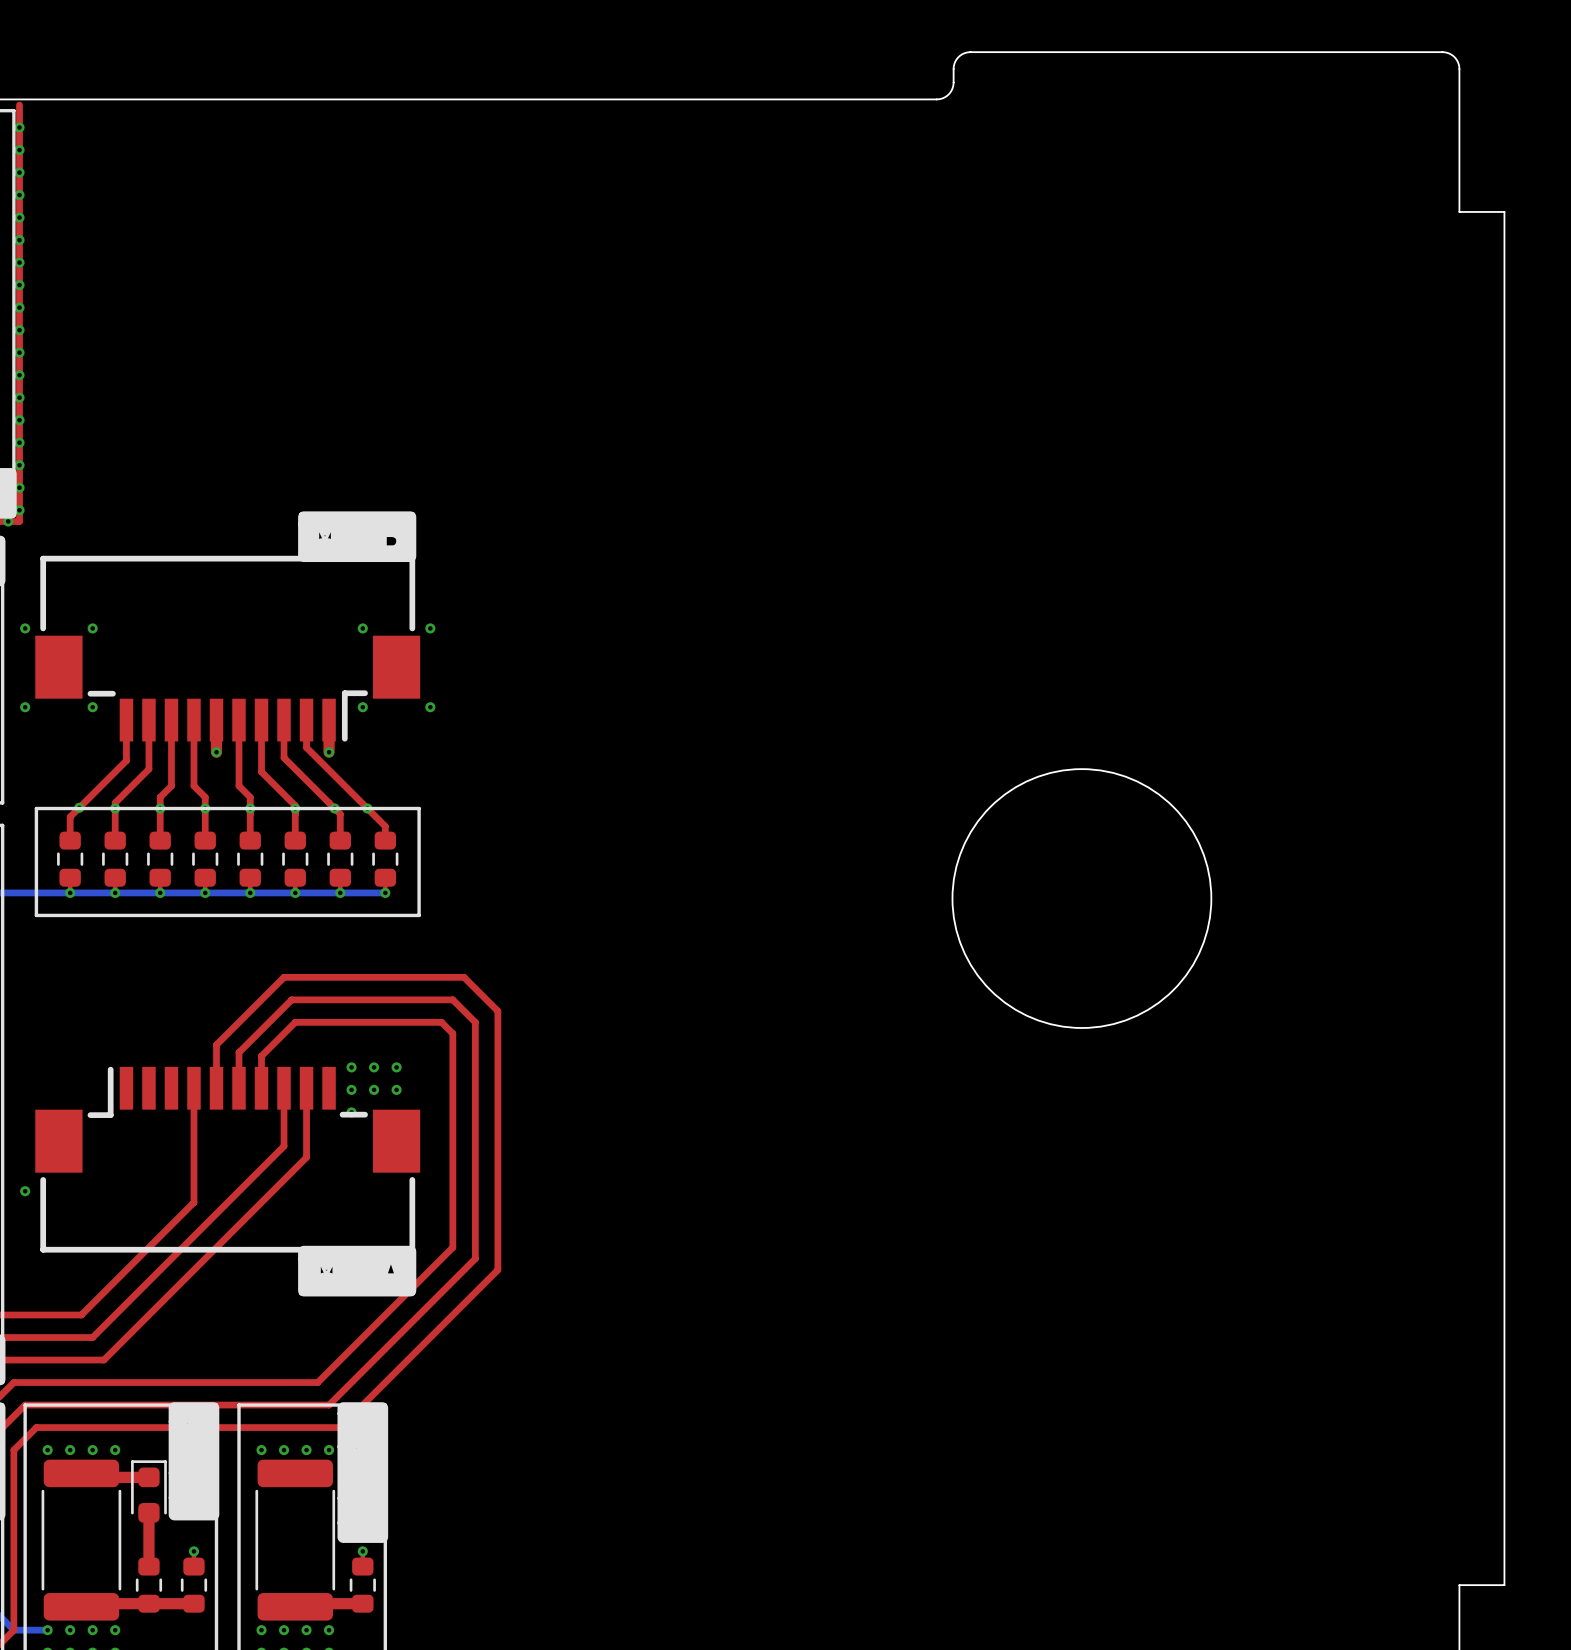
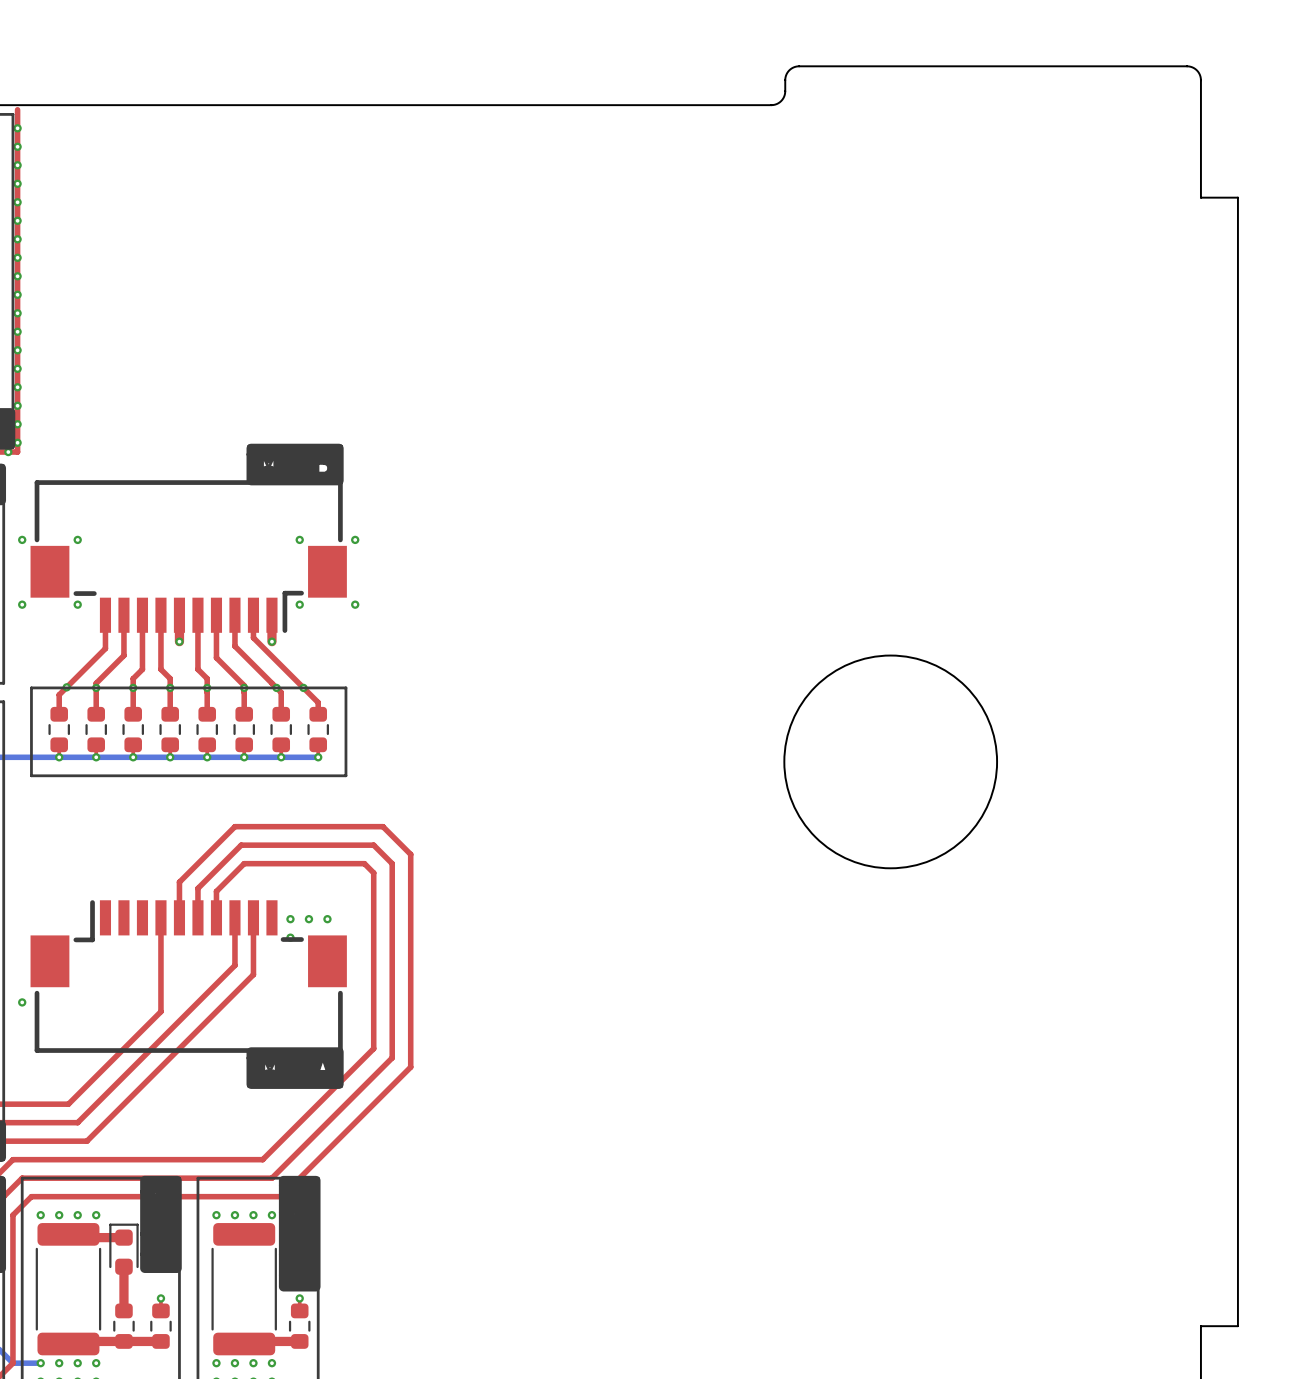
via: (351, 1067) -> none
via: (374, 1067) -> none
via: (396, 1067) -> none

